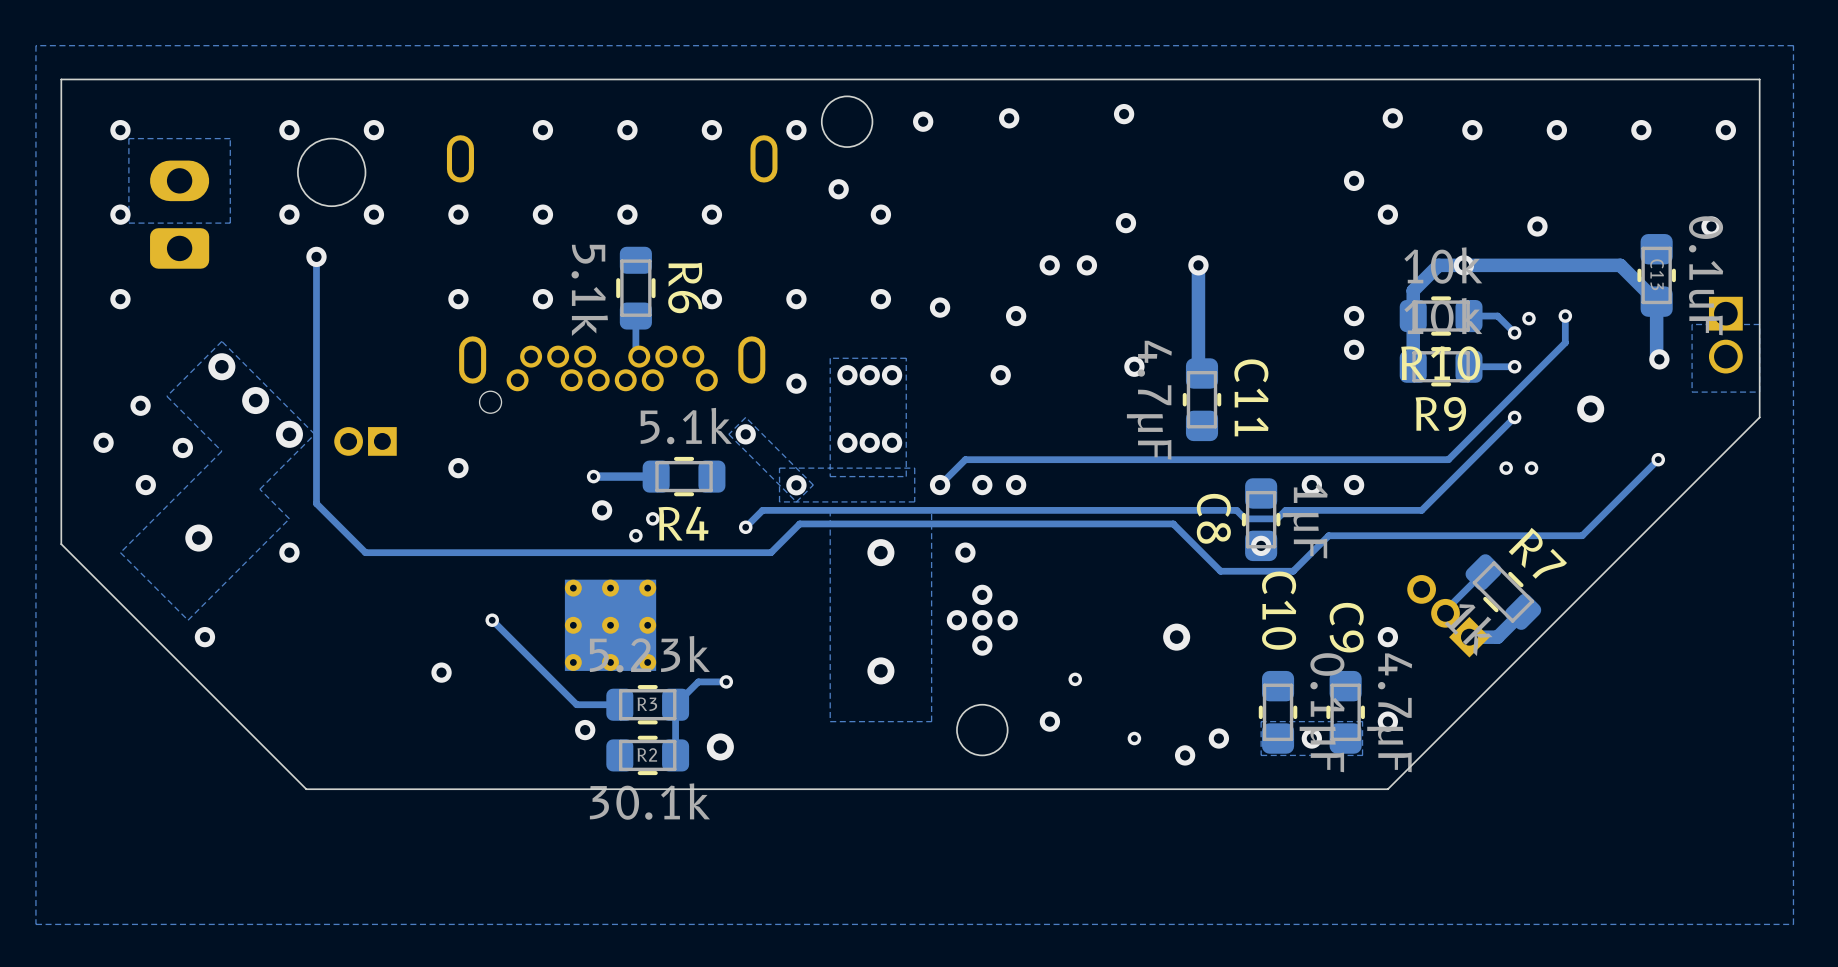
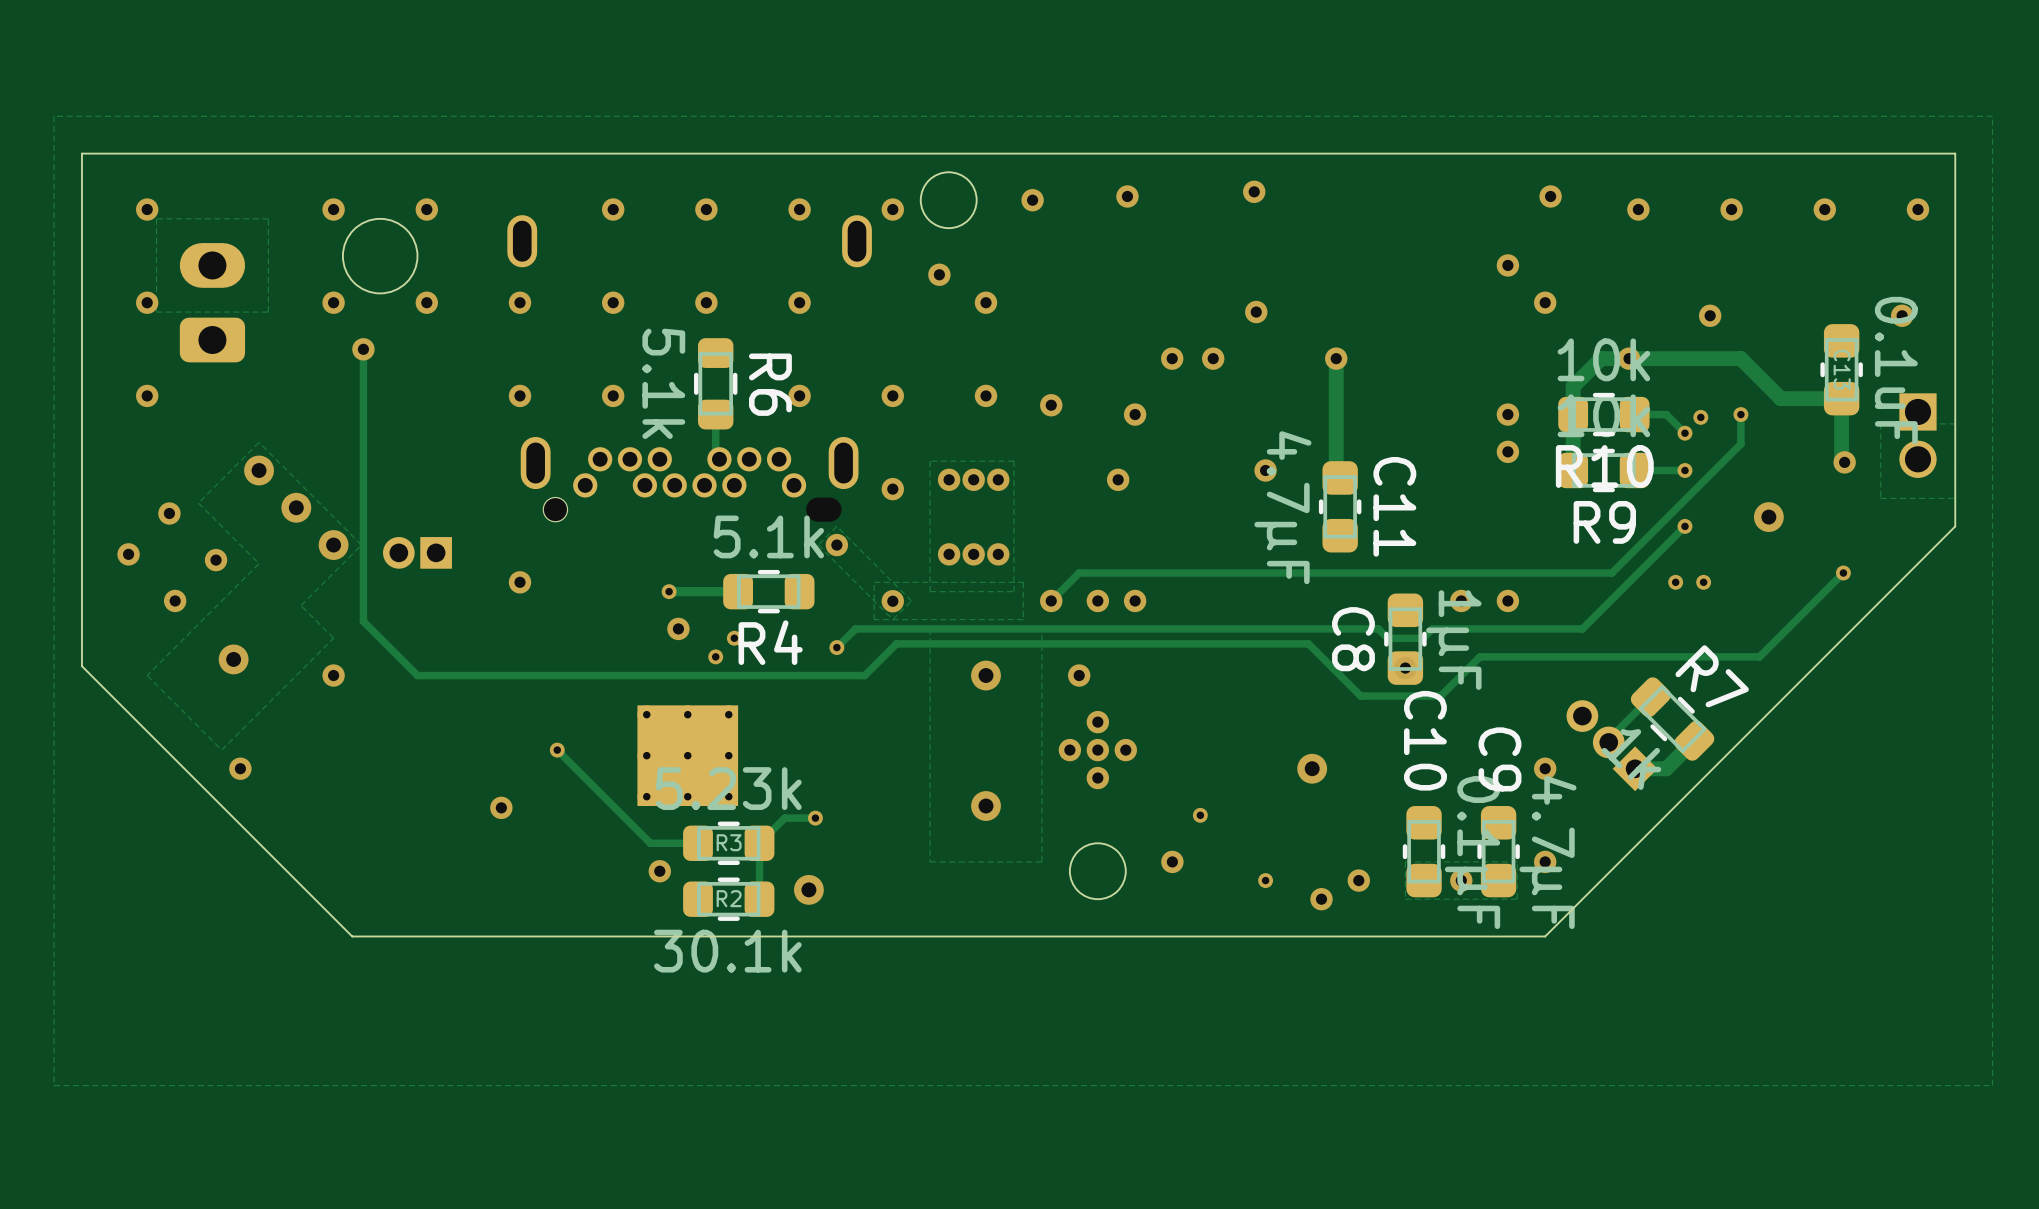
track: (1565, 265) (1620, 265) (1656, 301) -> (1740, 358) (1780, 398) (1841, 398)

